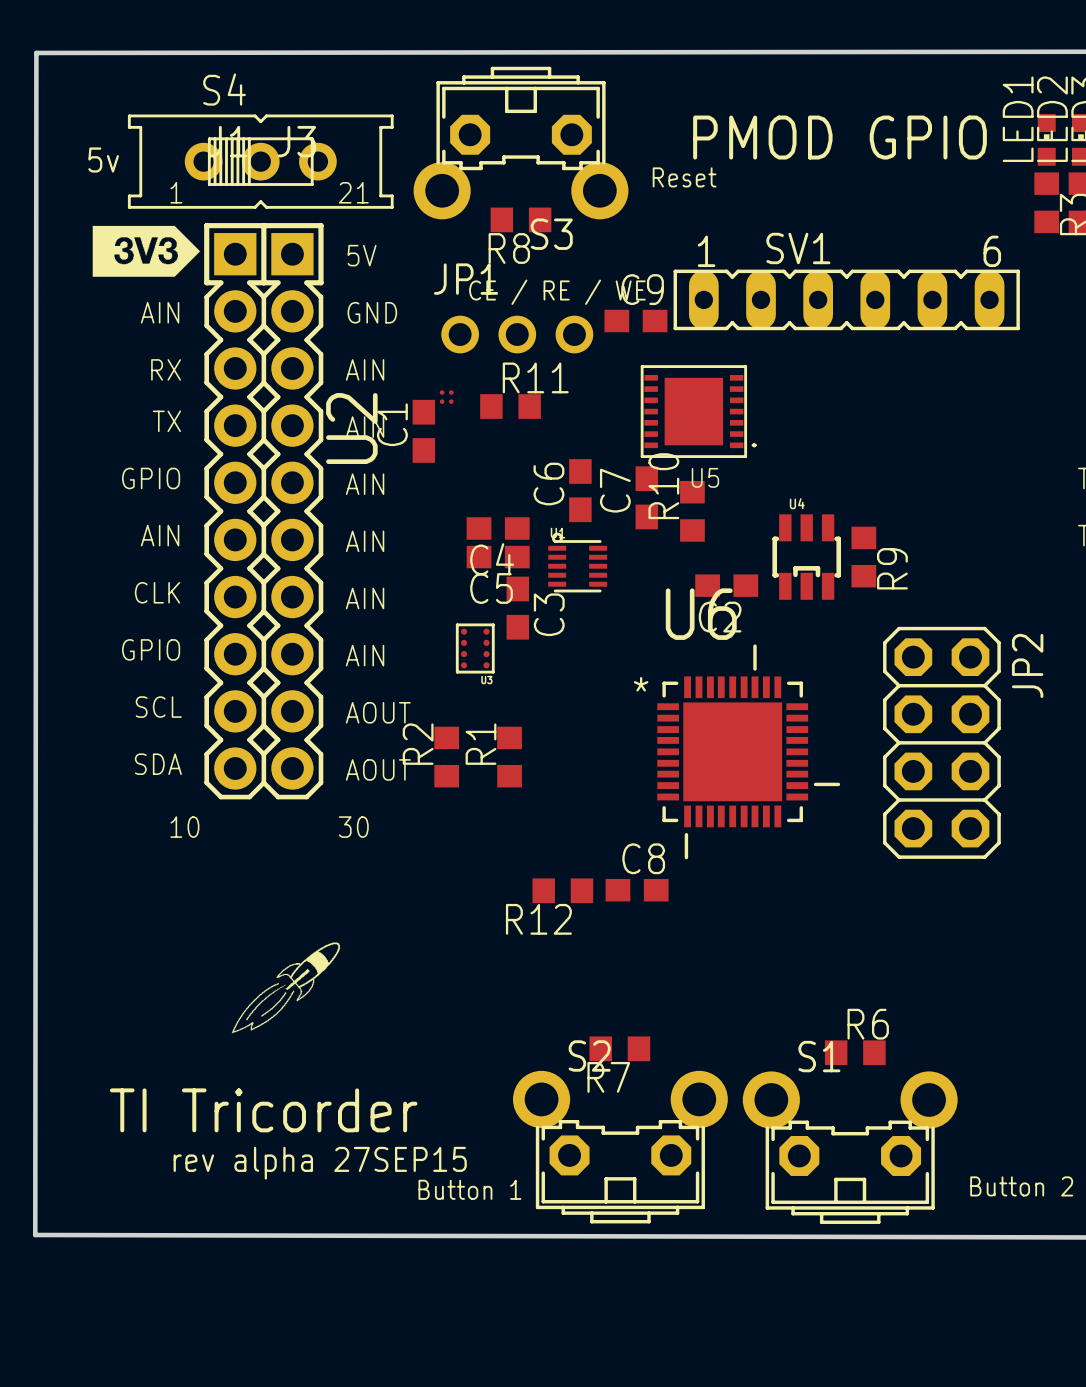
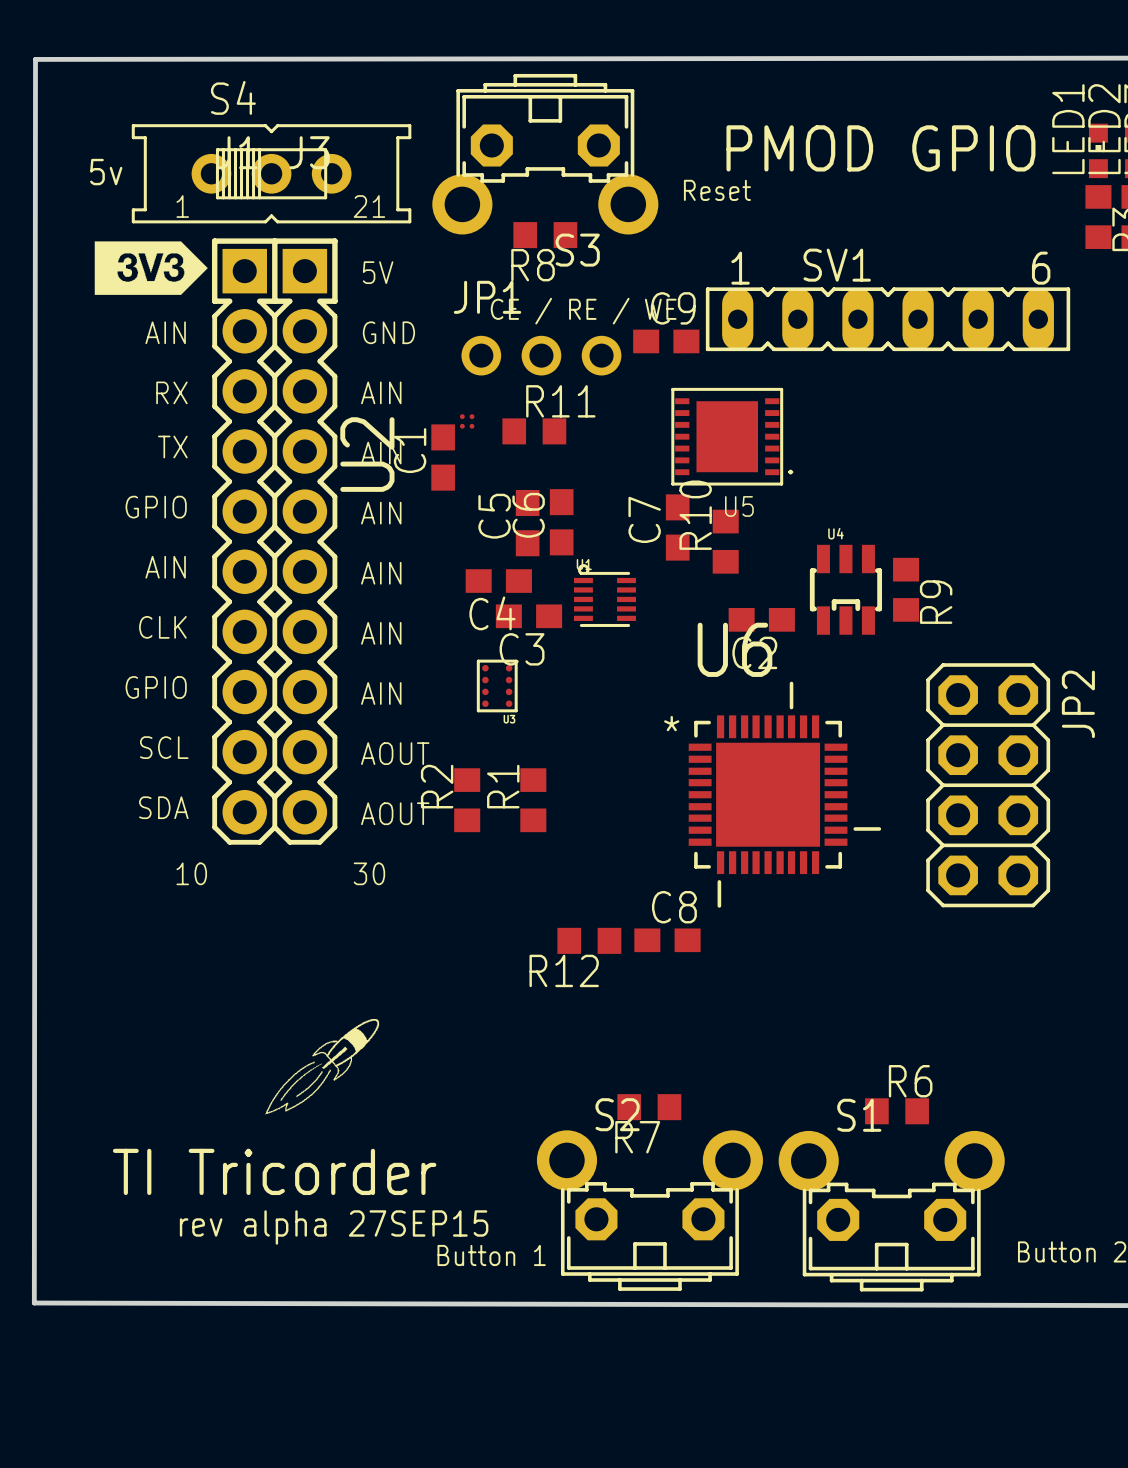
C6 position: (580, 490) -> (561, 522)
C4 position: (498, 528) -> (498, 581)
C5 rotation: 0° (498, 557) -> 90° clockwise (527, 523)
C5 position: (498, 557) -> (527, 523)
C3 rotation: 0° (517, 608) -> 90° clockwise (528, 616)
drawing position: (285, 987) -> (322, 1066)

